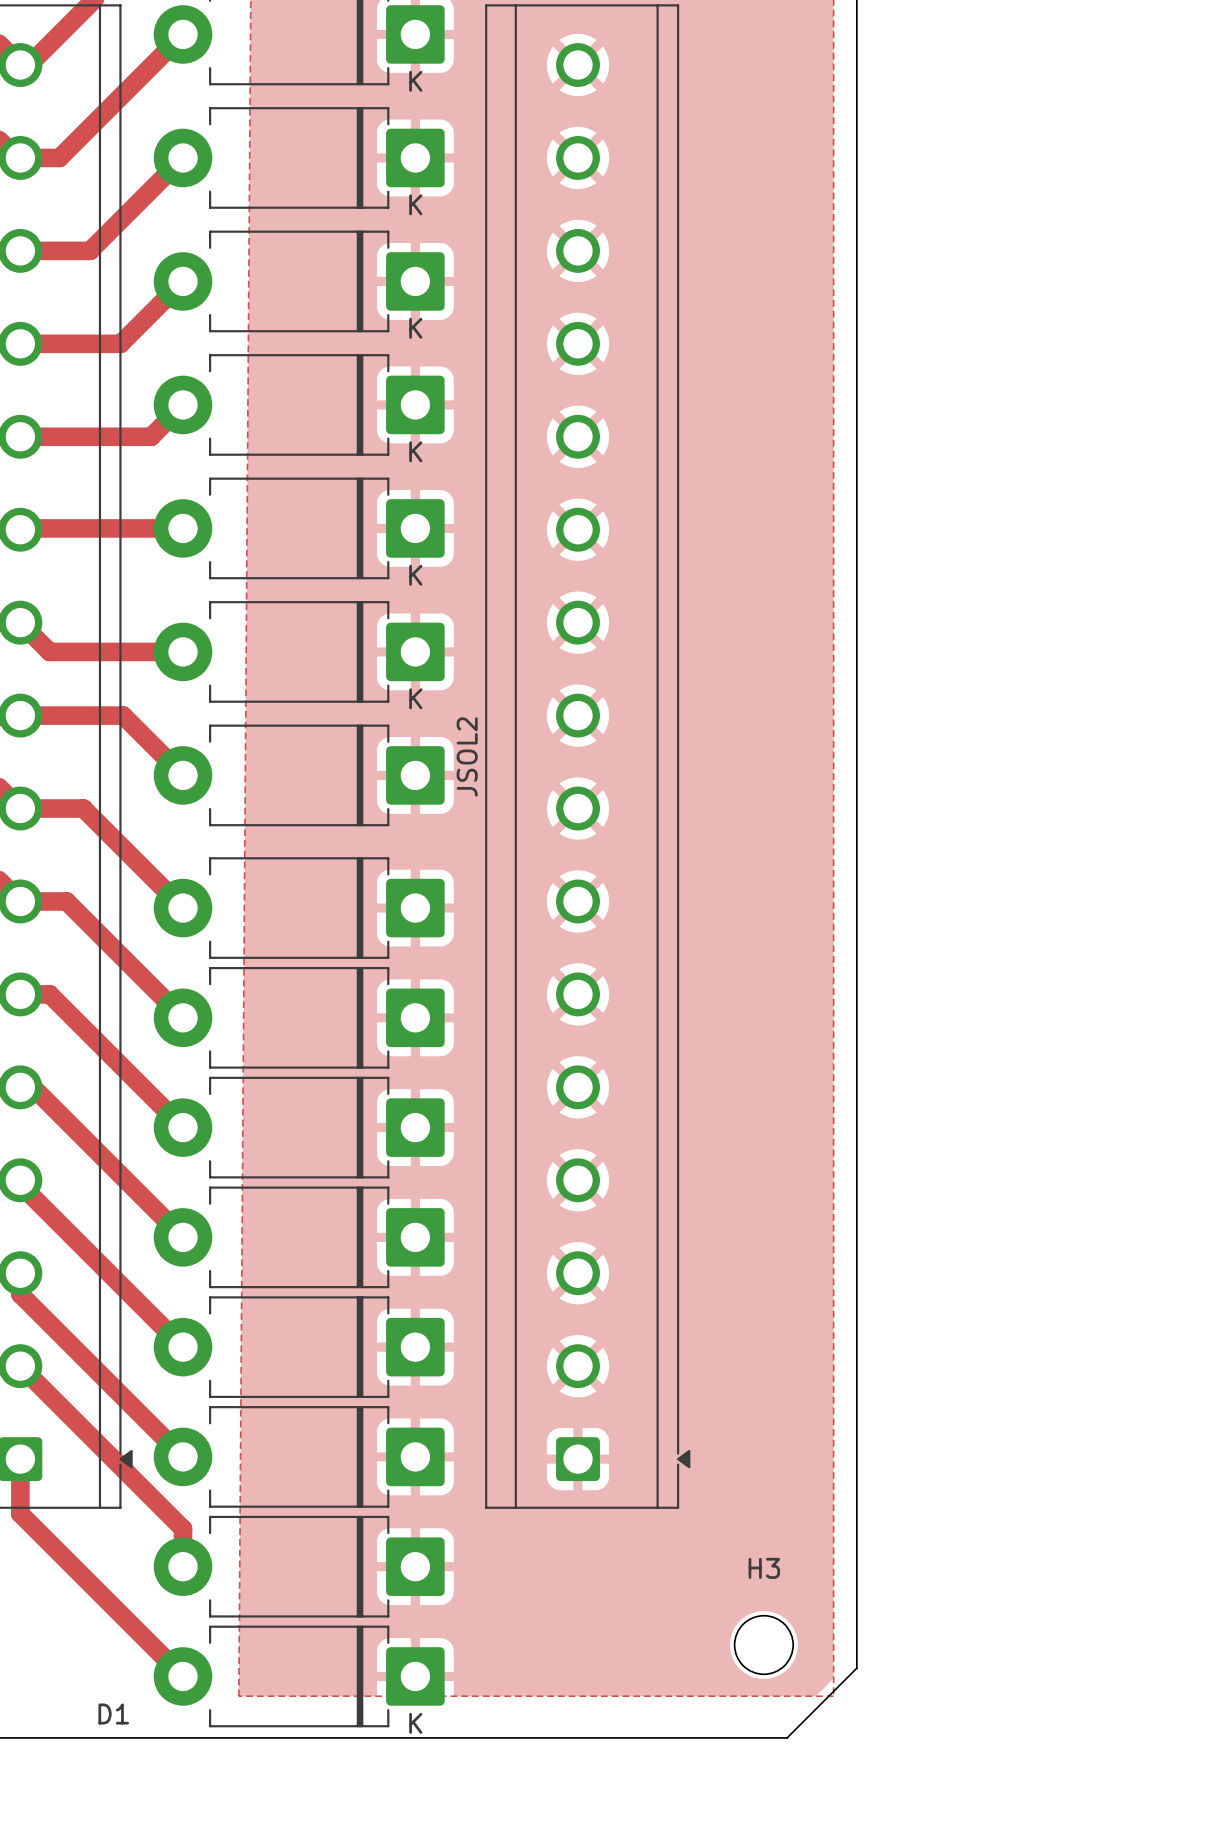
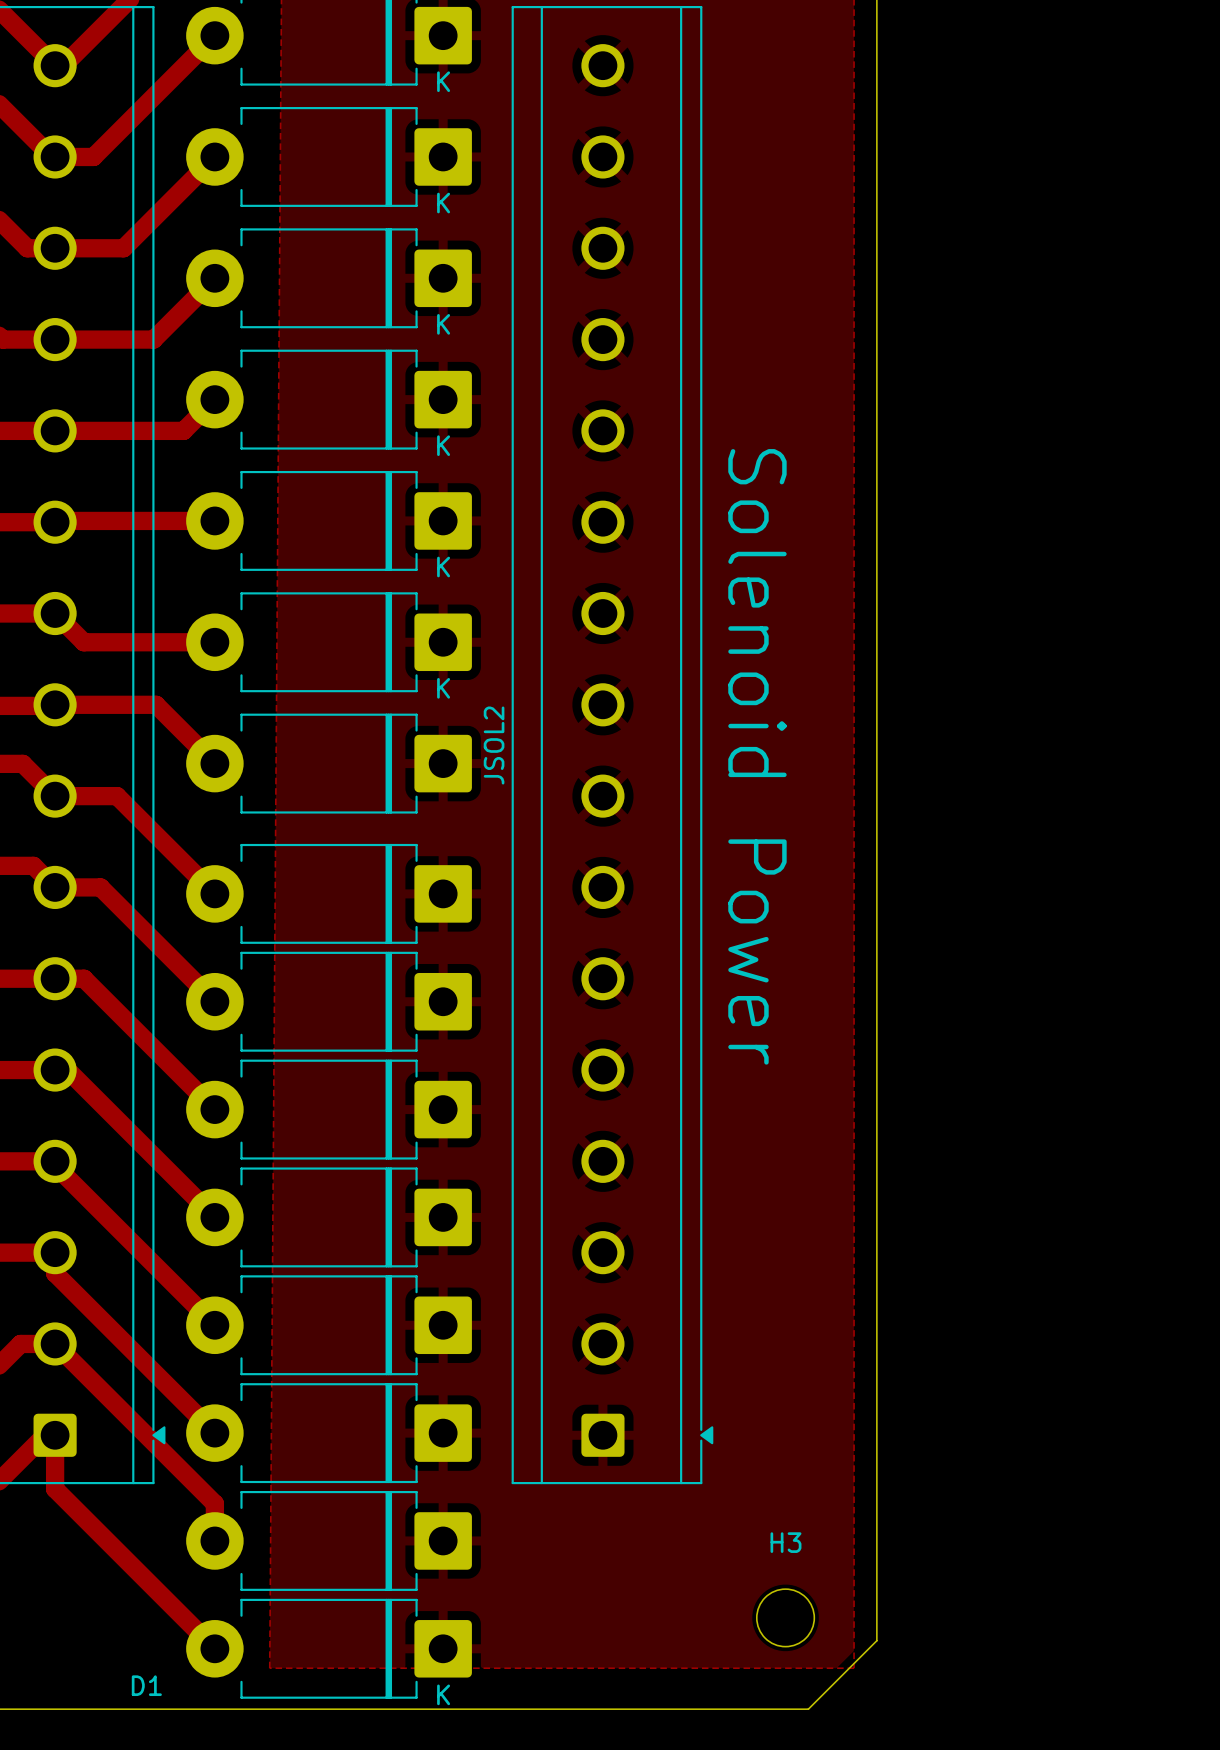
text: none -> Solenoid Power (757, 756)

